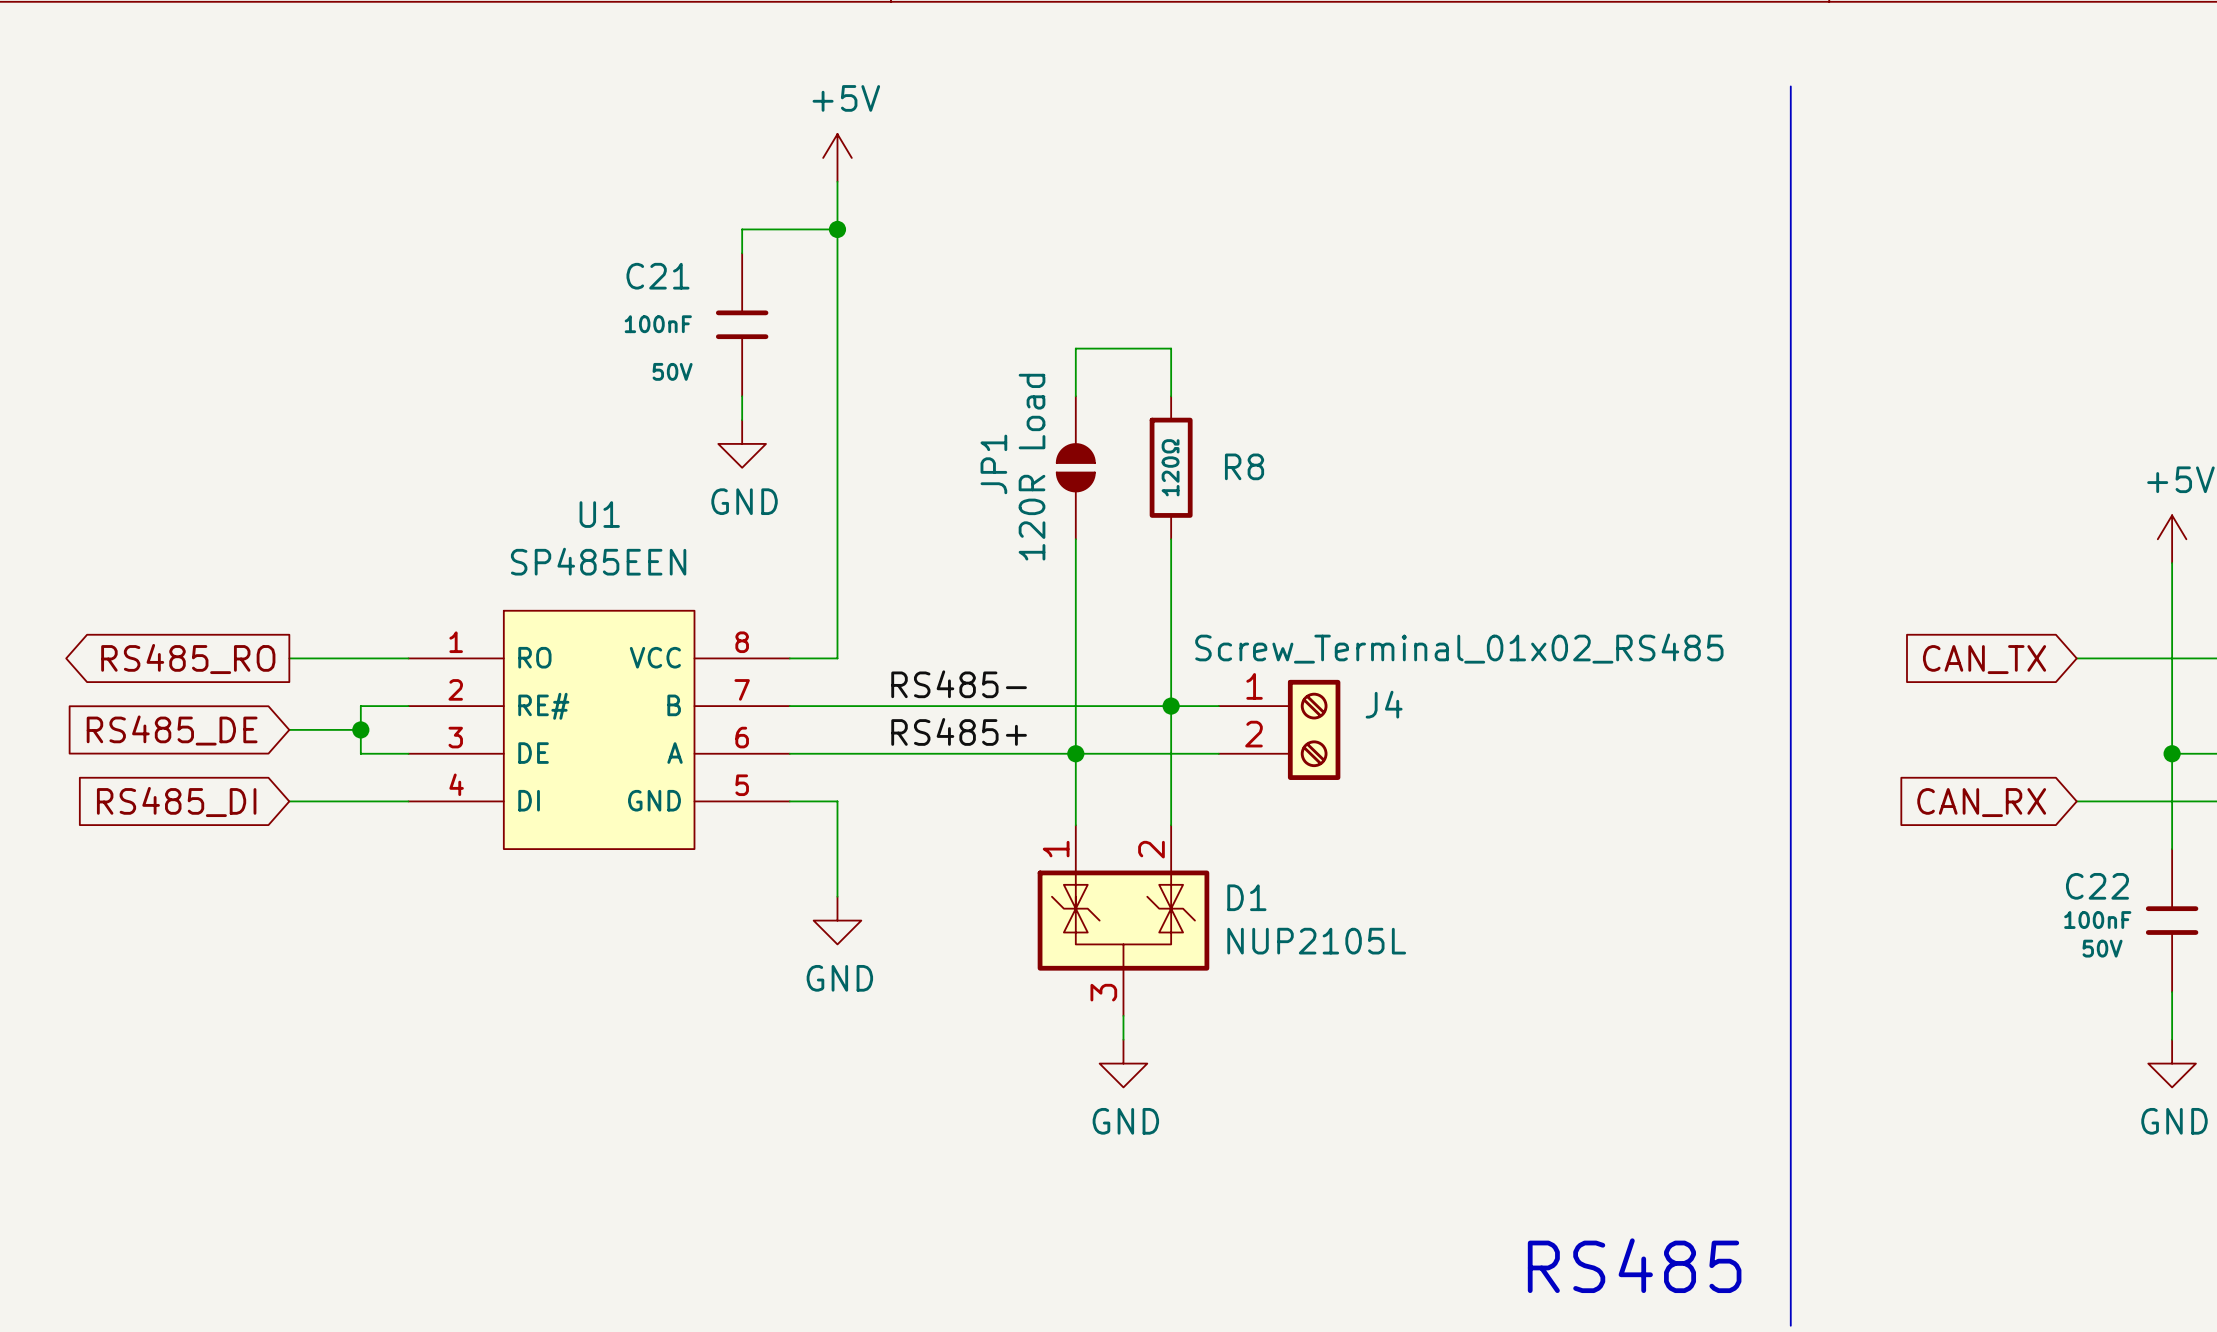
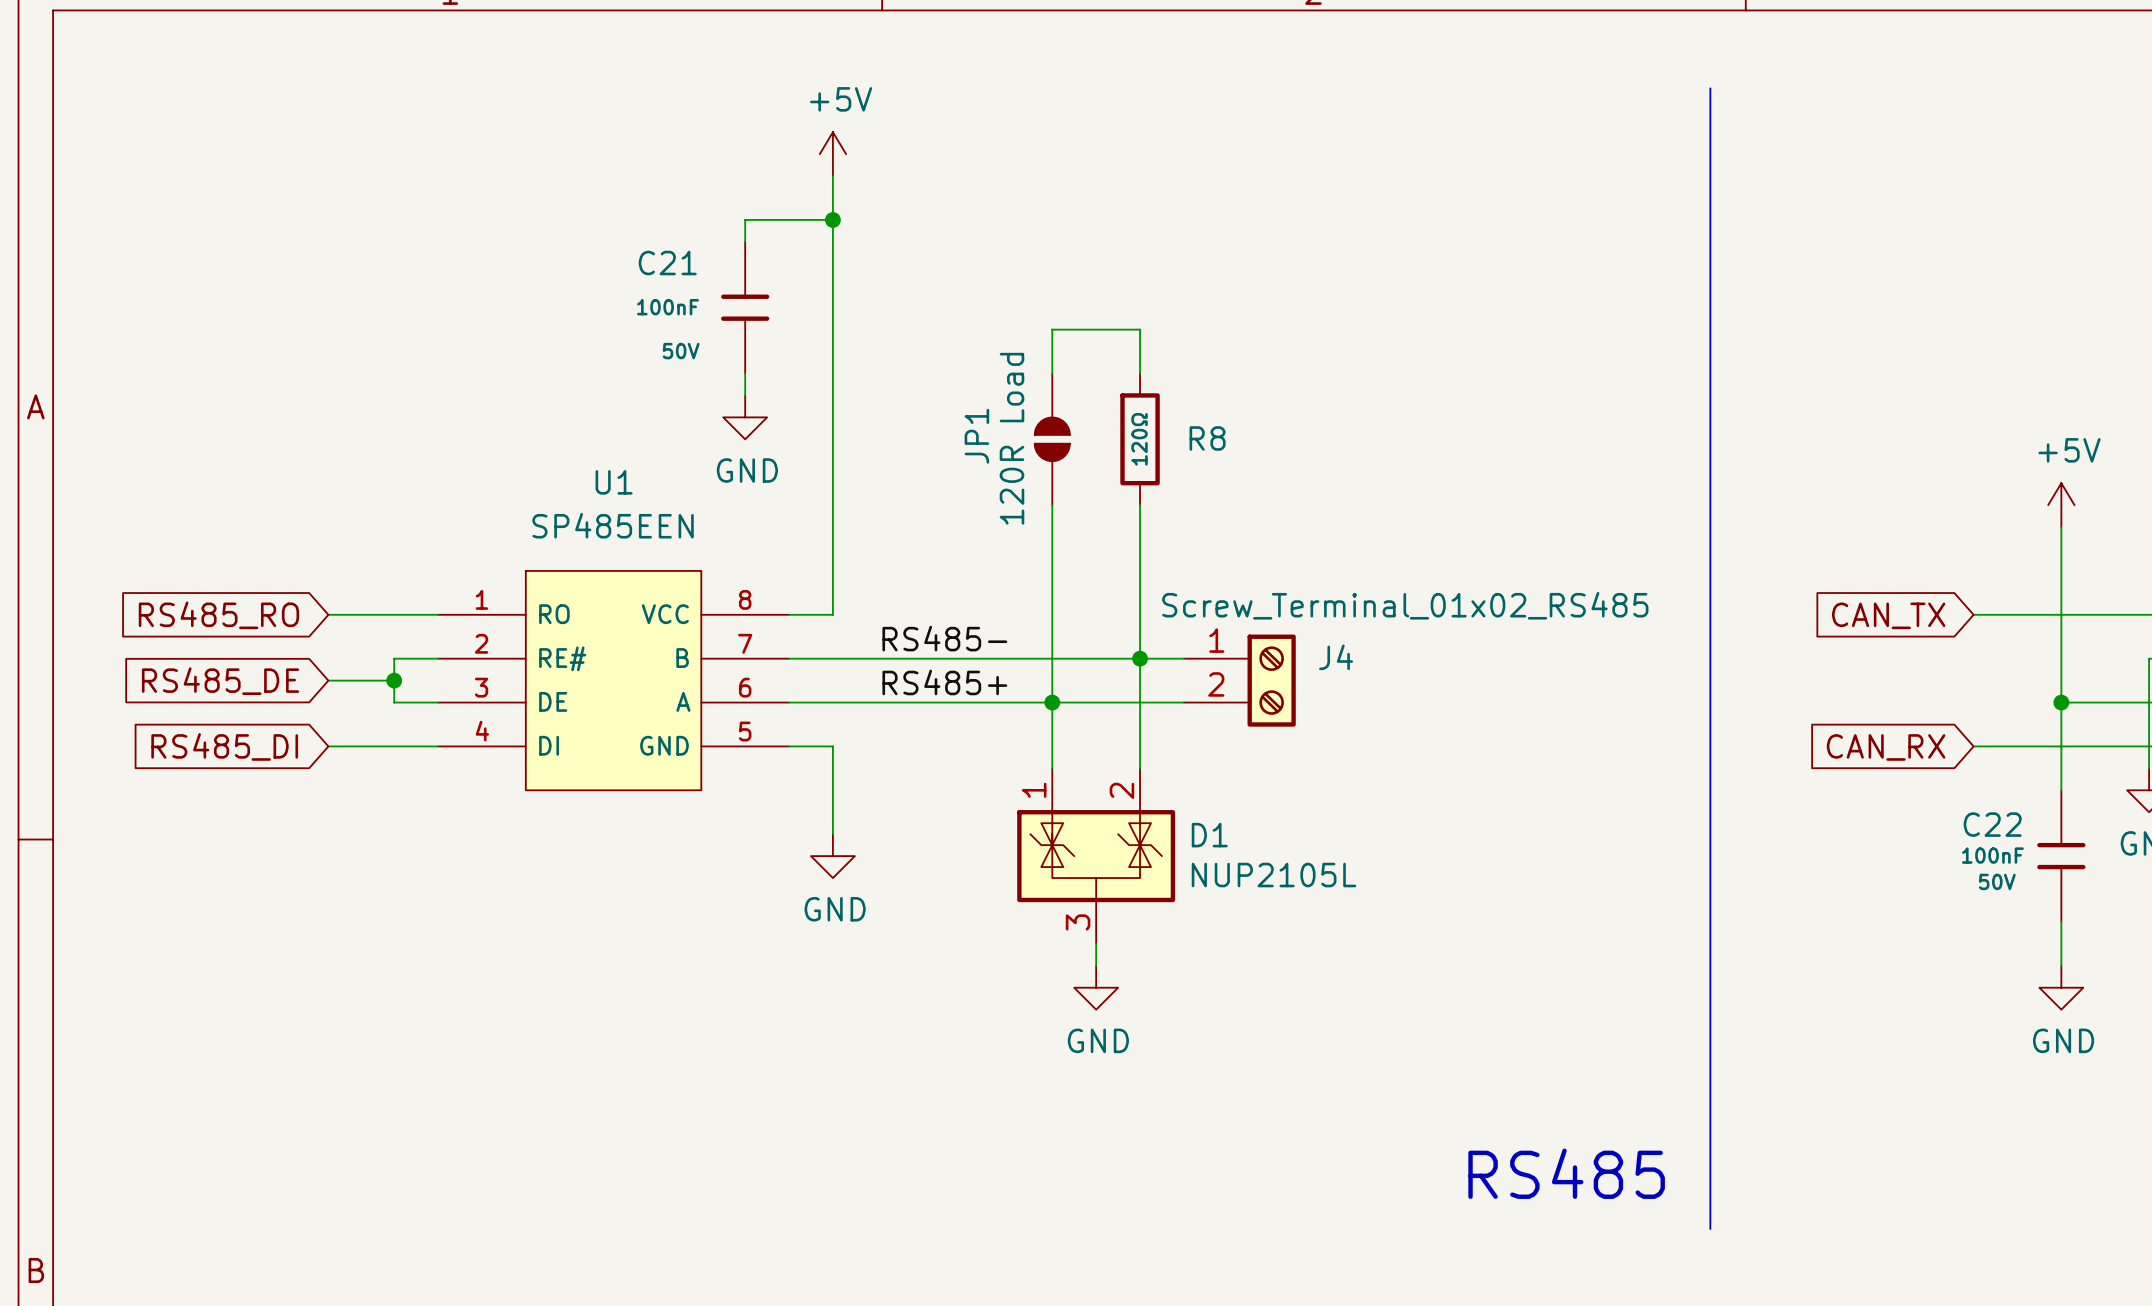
global label shape: output (188, 658) -> input (218, 615)

